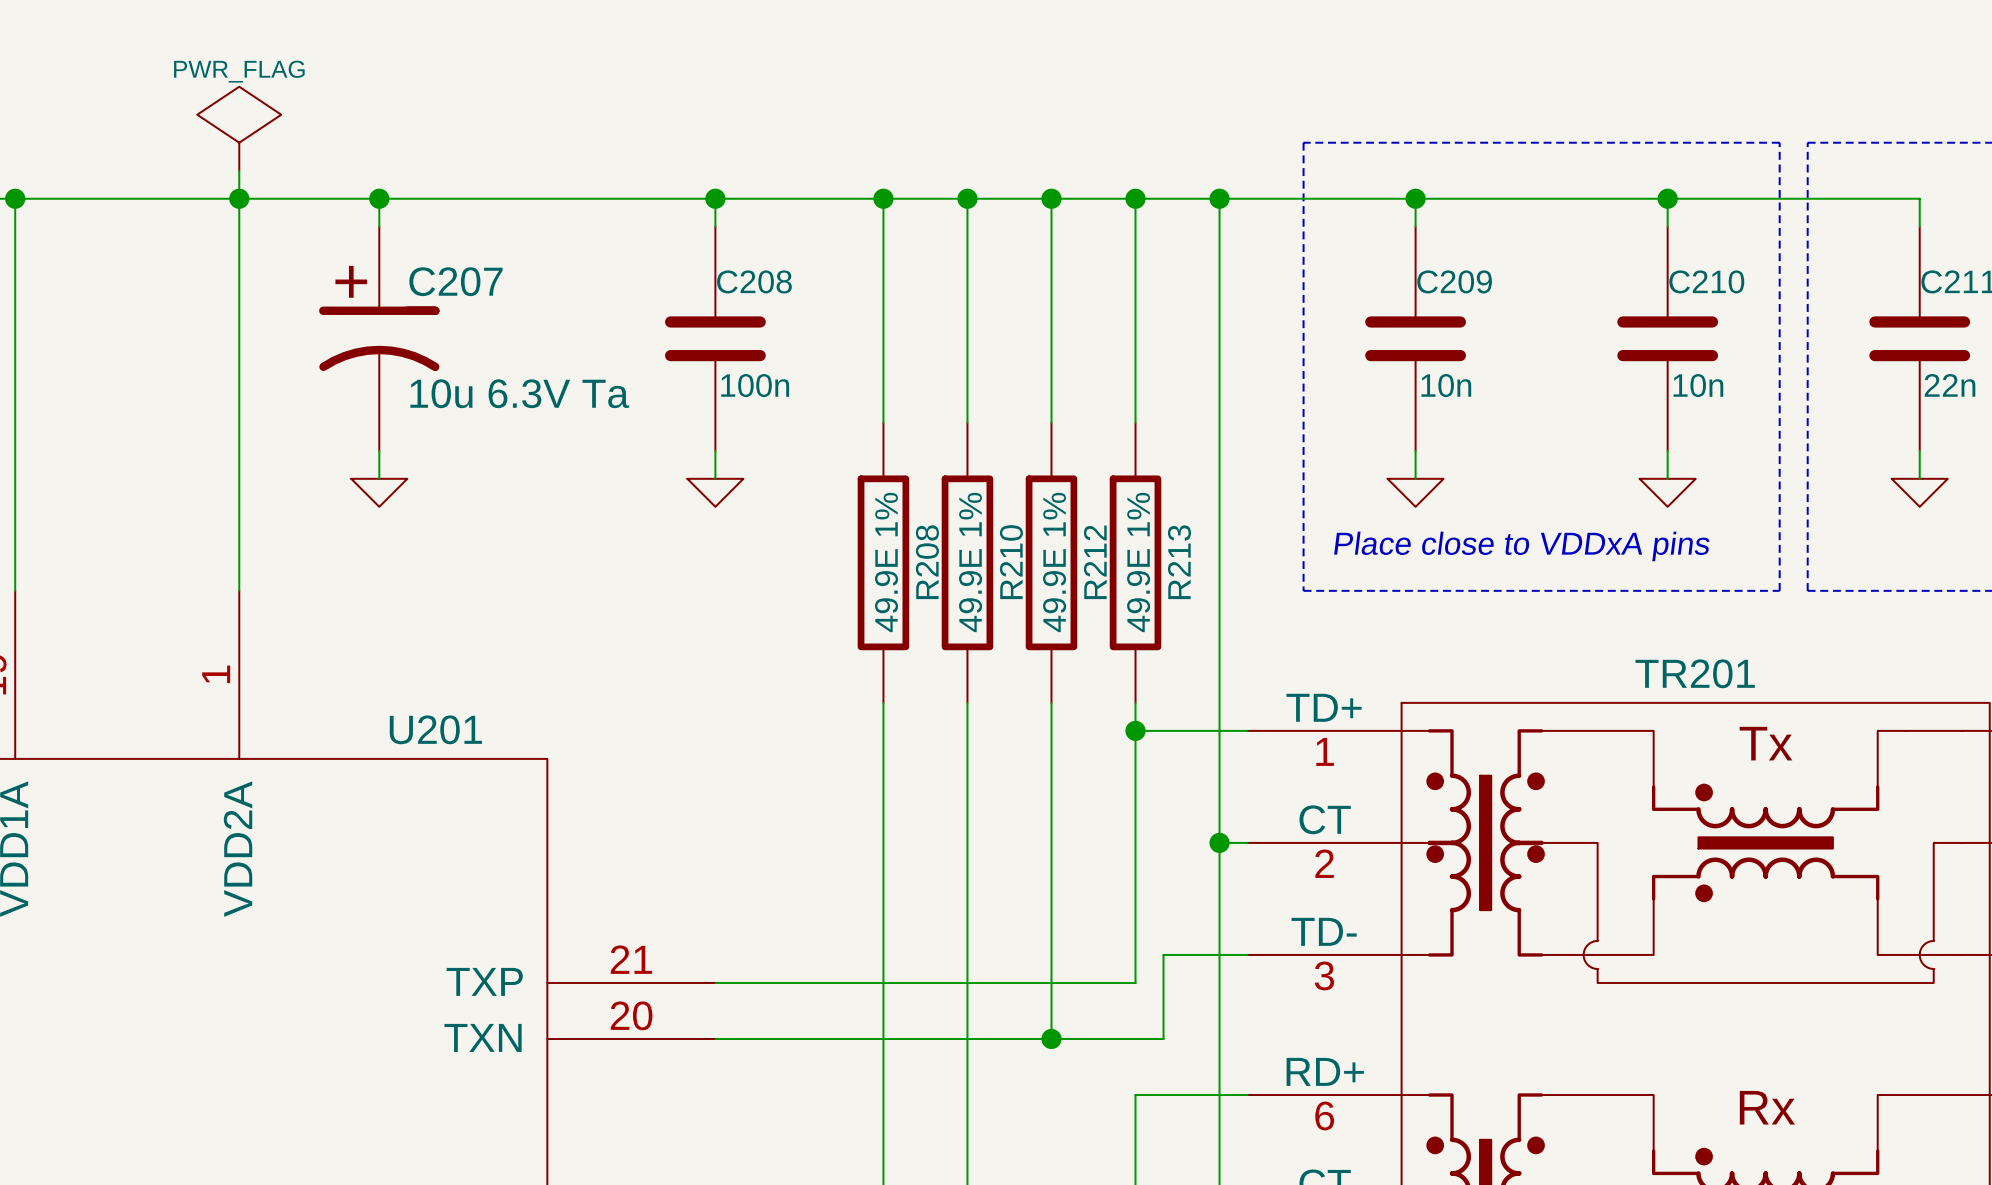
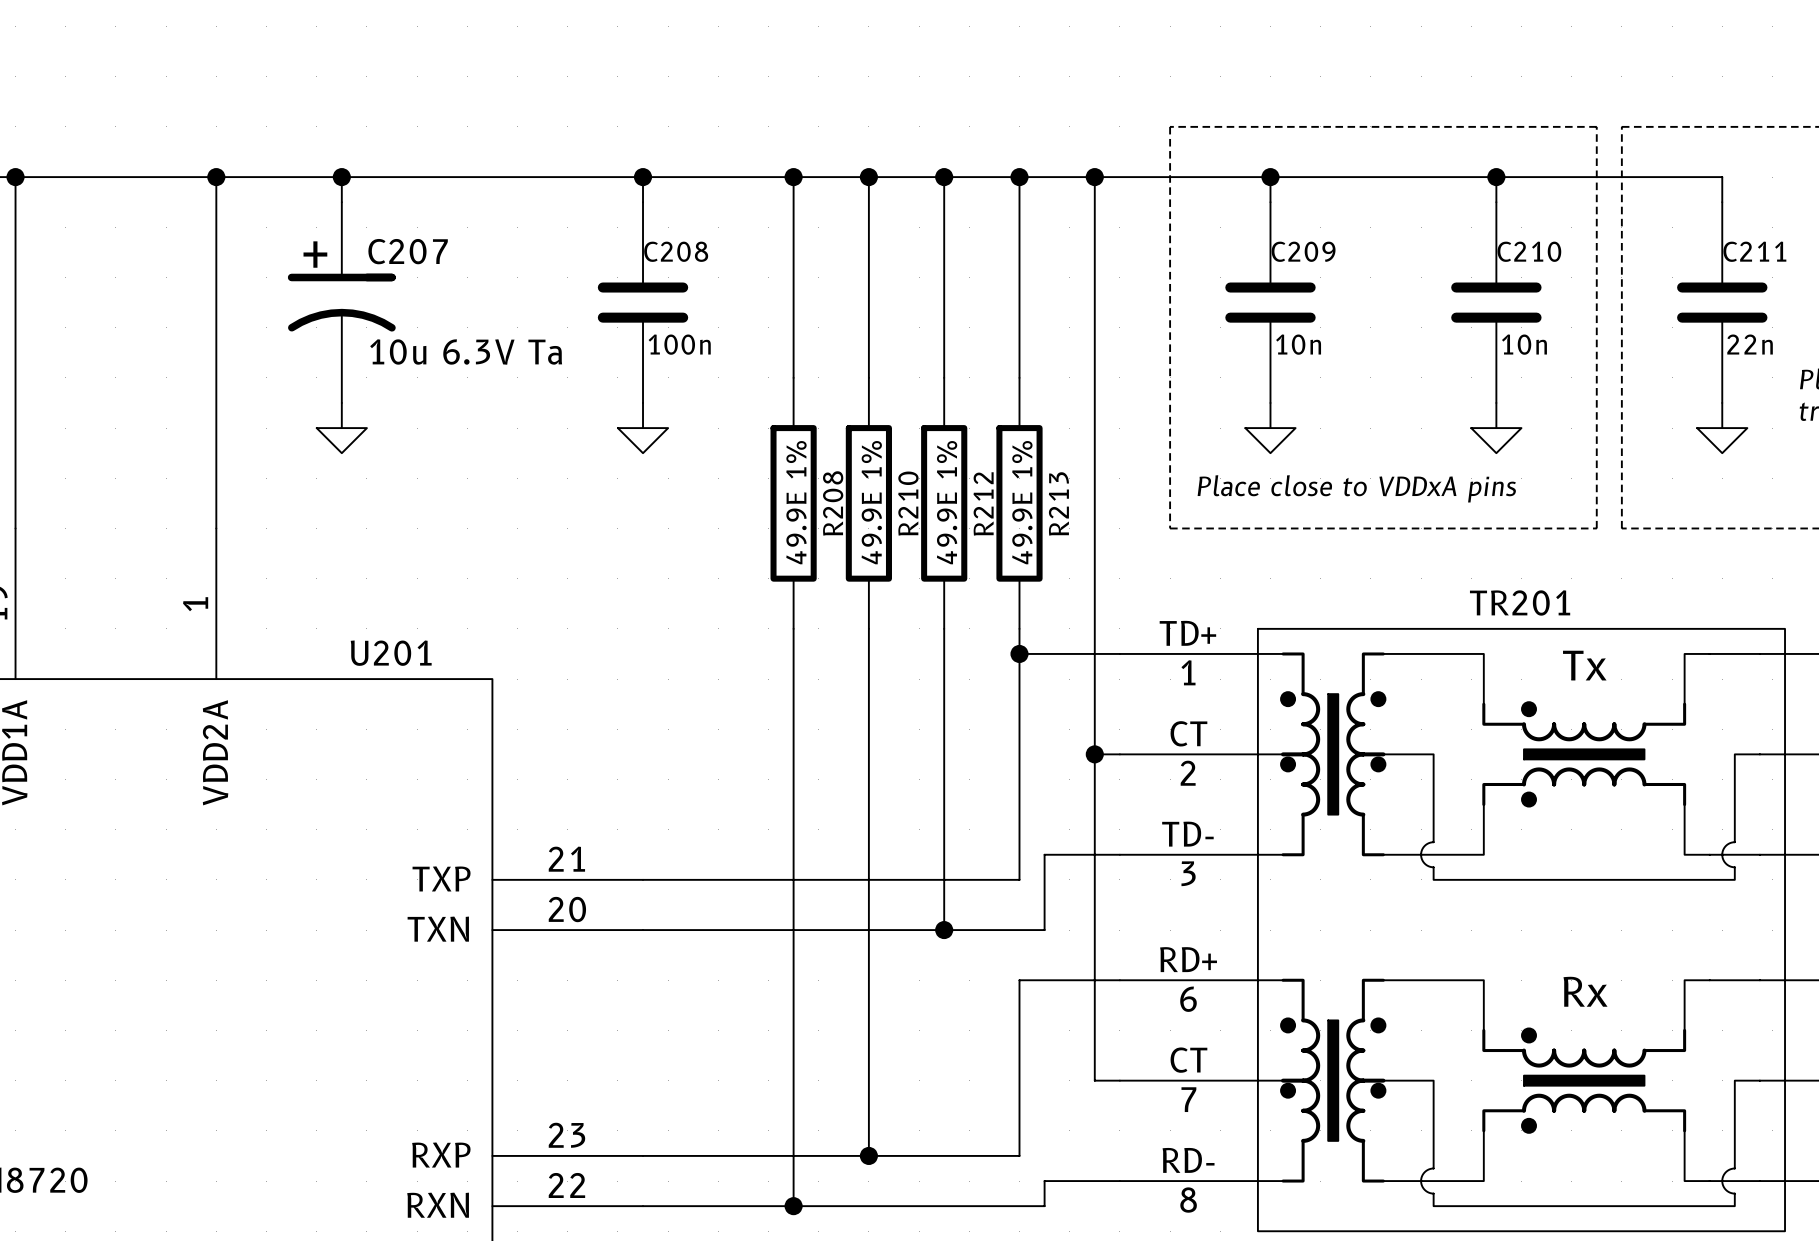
power symbol: PWR_FLAG (239, 128) -> none
wire: (239, 170) (239, 198) -> none

